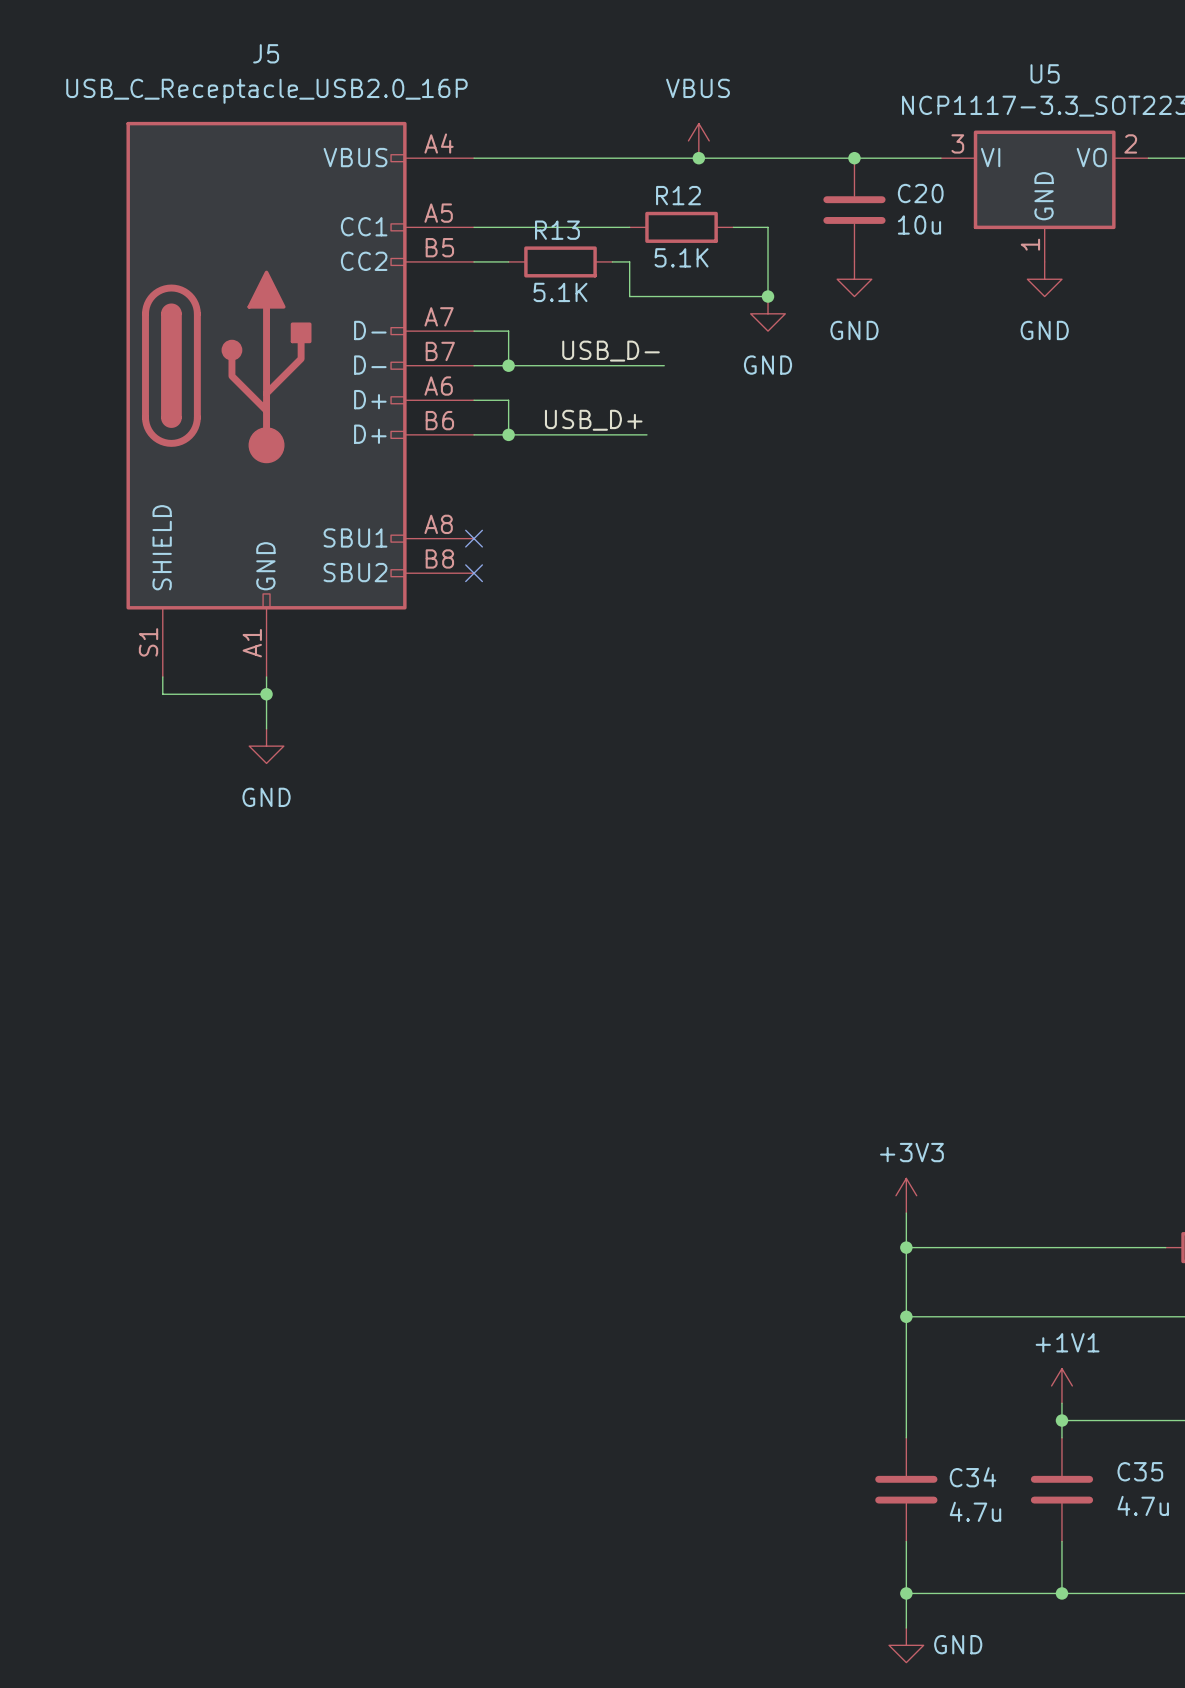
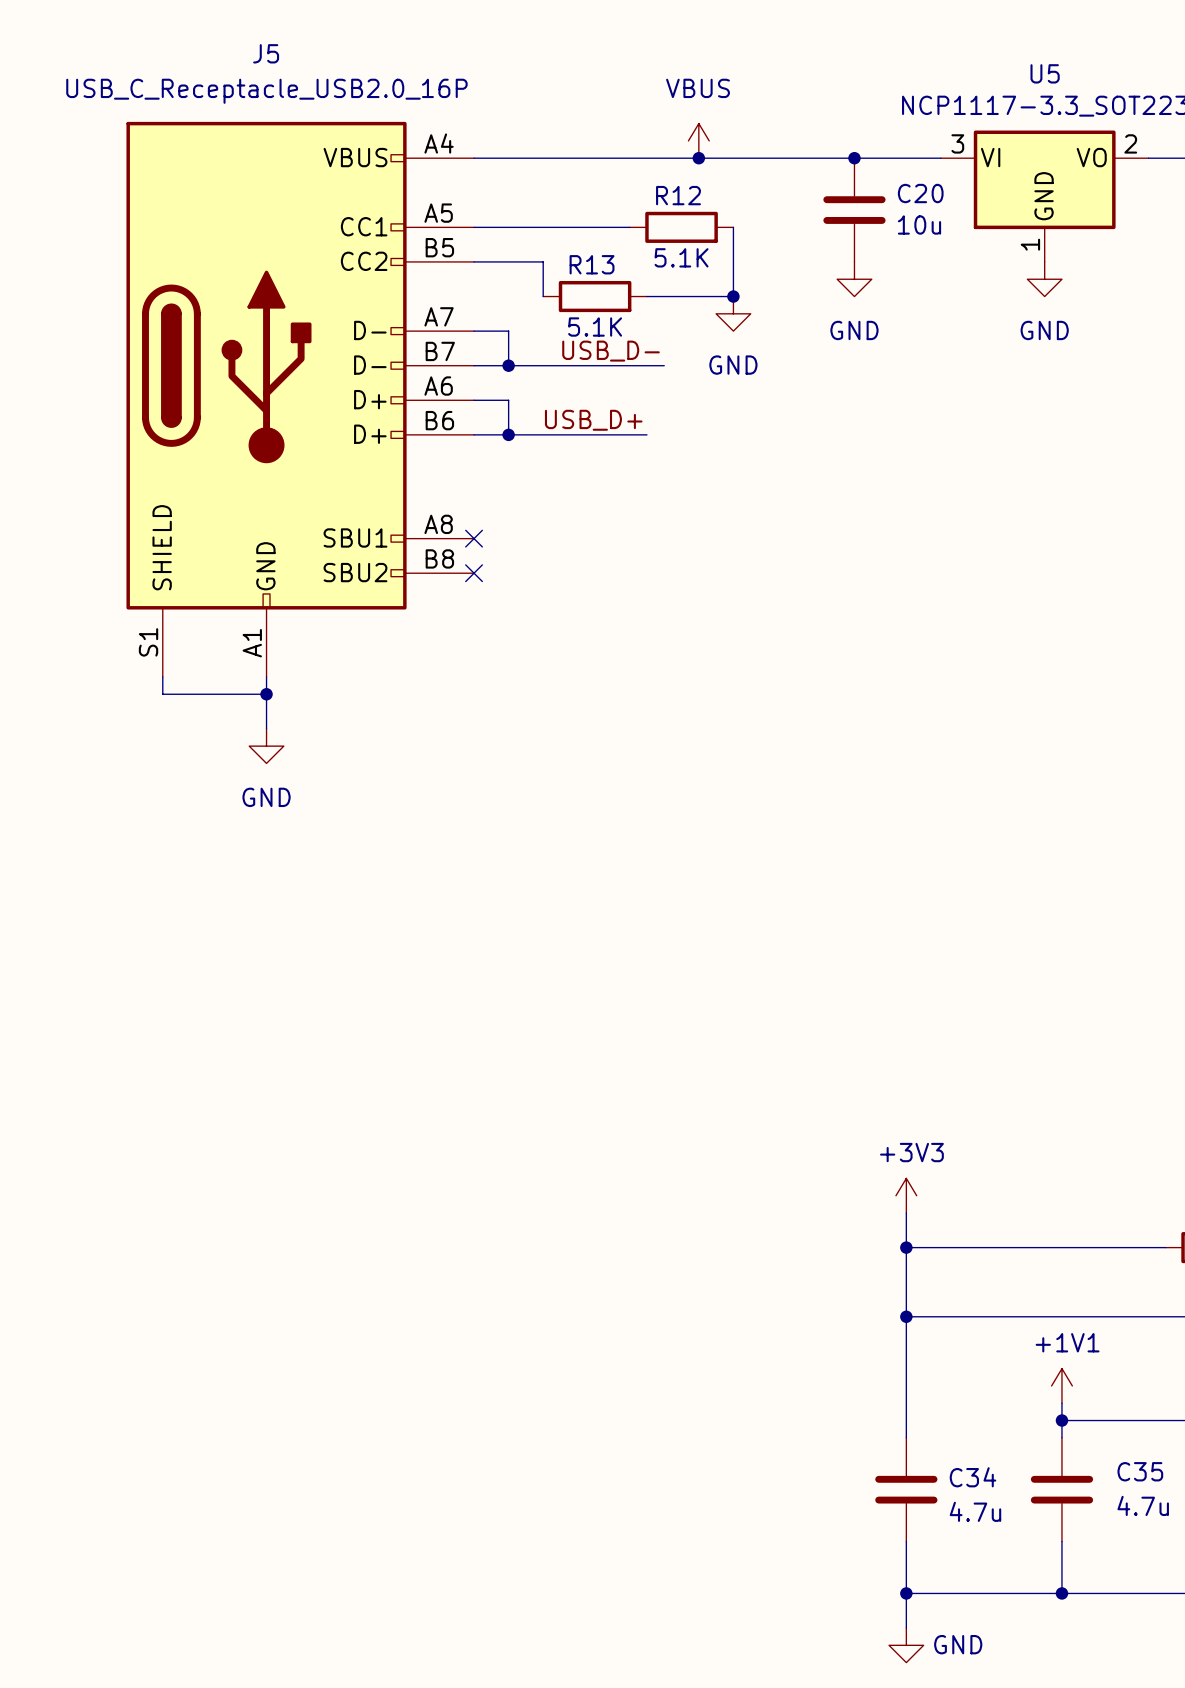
wire: (733, 227) (768, 227) (768, 296) (733, 296) -> (733, 227) (733, 296)
wire: none -> (508, 261) (543, 261) (543, 296)
R13 position: (560, 261) -> (595, 296)
wire: (612, 261) (629, 261) (629, 296) (646, 296) -> none
junction position: (768, 296) -> (733, 296)
power symbol position: GND (768, 313) -> GND (733, 313)

